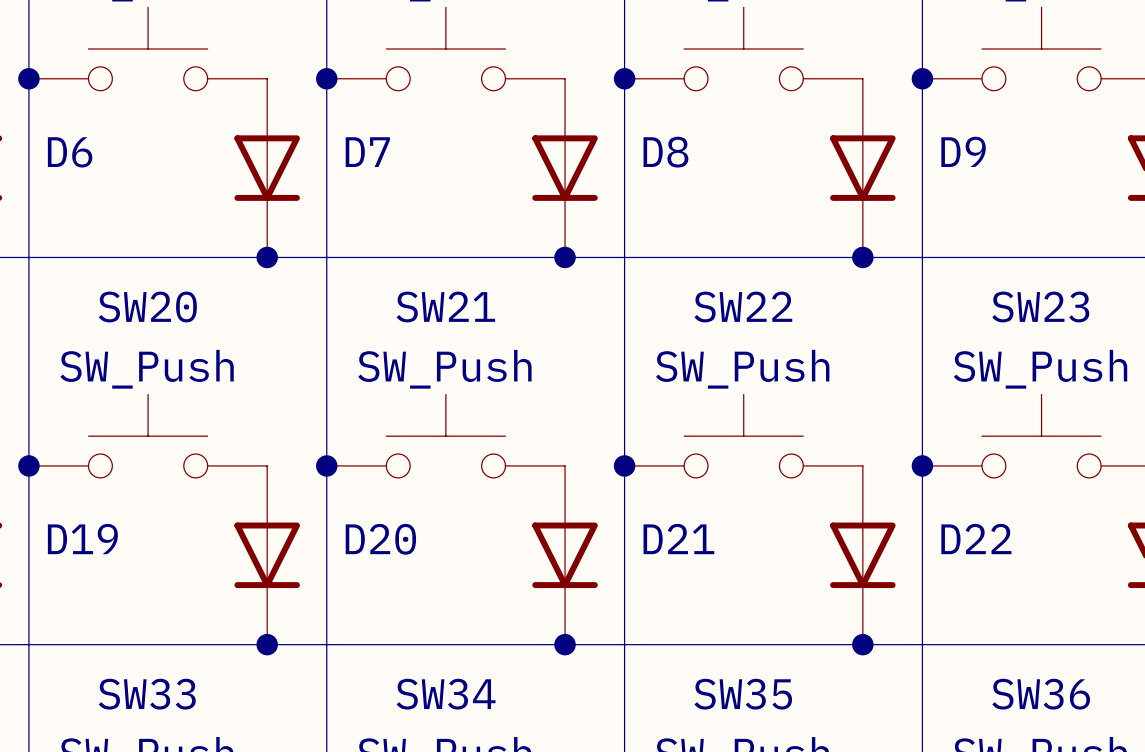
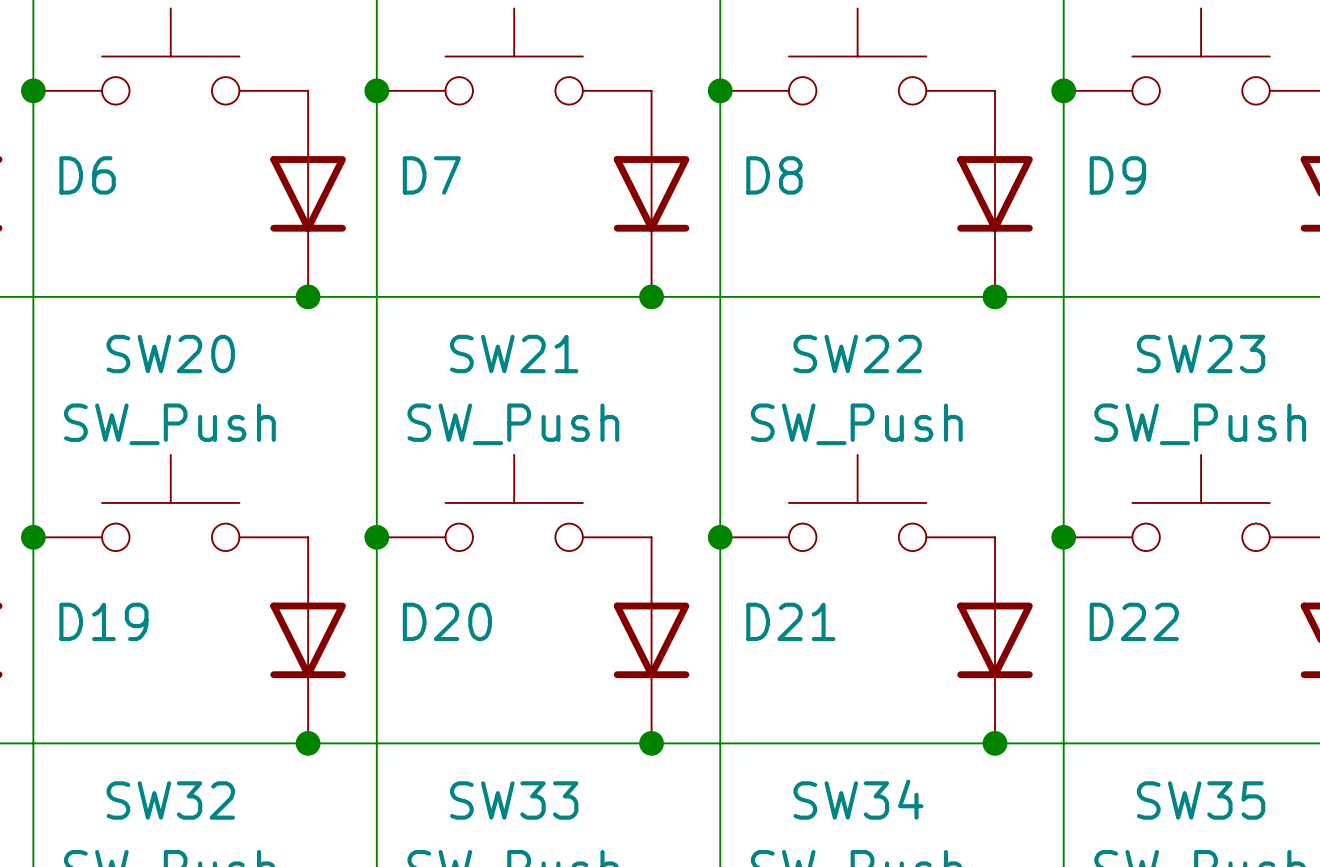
SW33 name: SW33 (147, 694) -> SW32 (170, 800)
SW34 name: SW34 (446, 694) -> SW33 (514, 800)
SW35 name: SW35 (743, 694) -> SW34 (858, 799)
SW36 name: SW36 (1041, 694) -> SW35 (1201, 800)

